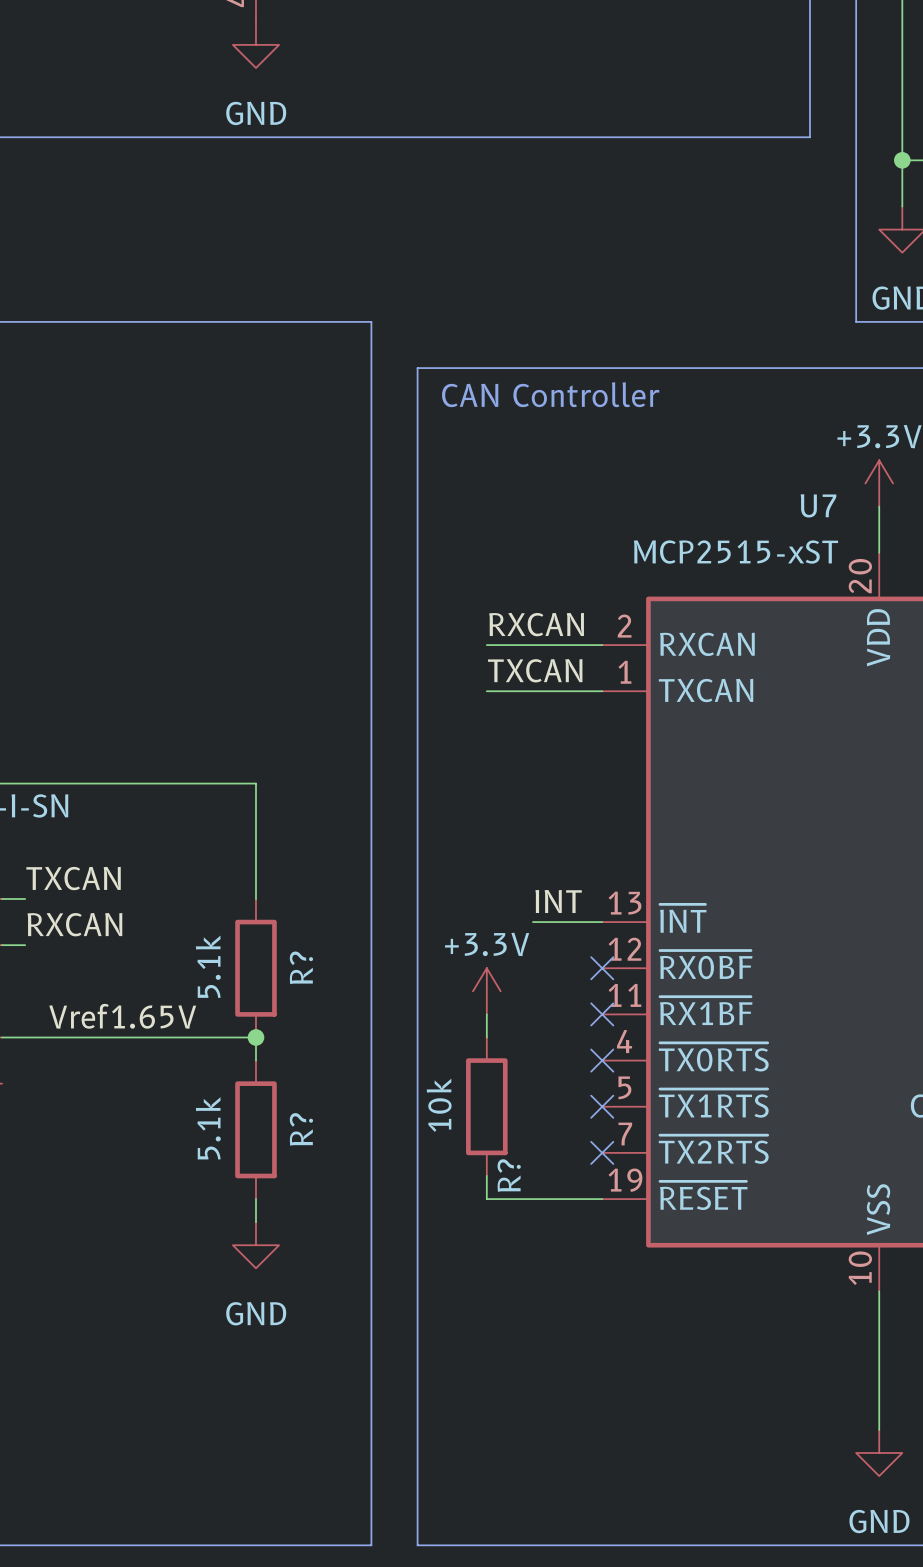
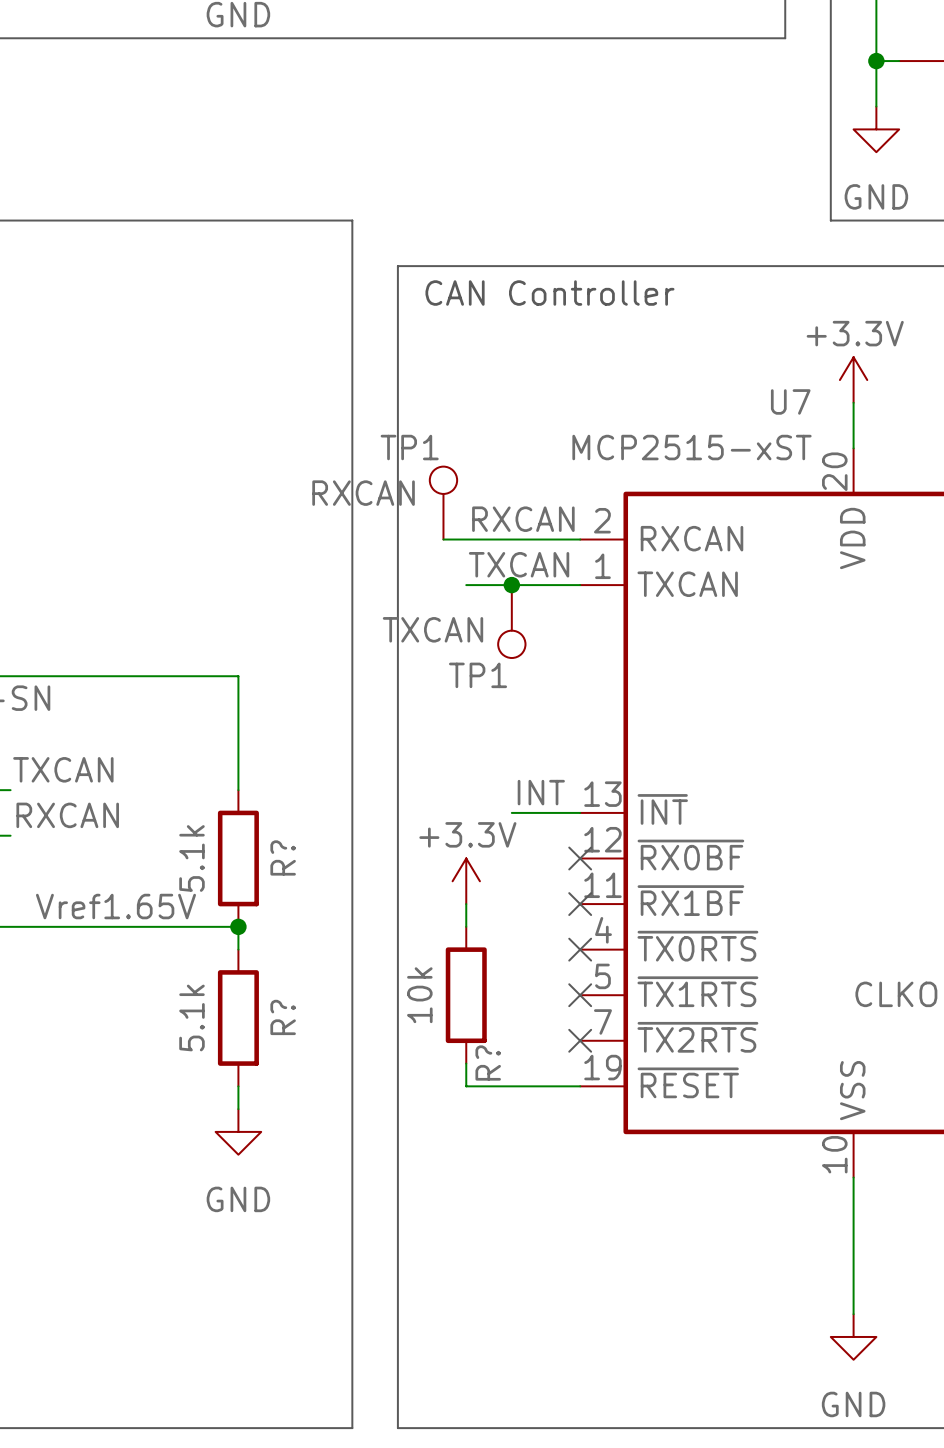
TP1: none -> RXCAN (443, 503)
wire: none -> (443, 539) (466, 539)
junction: none -> (511, 585)
TP1: none -> TXCAN (511, 621)

